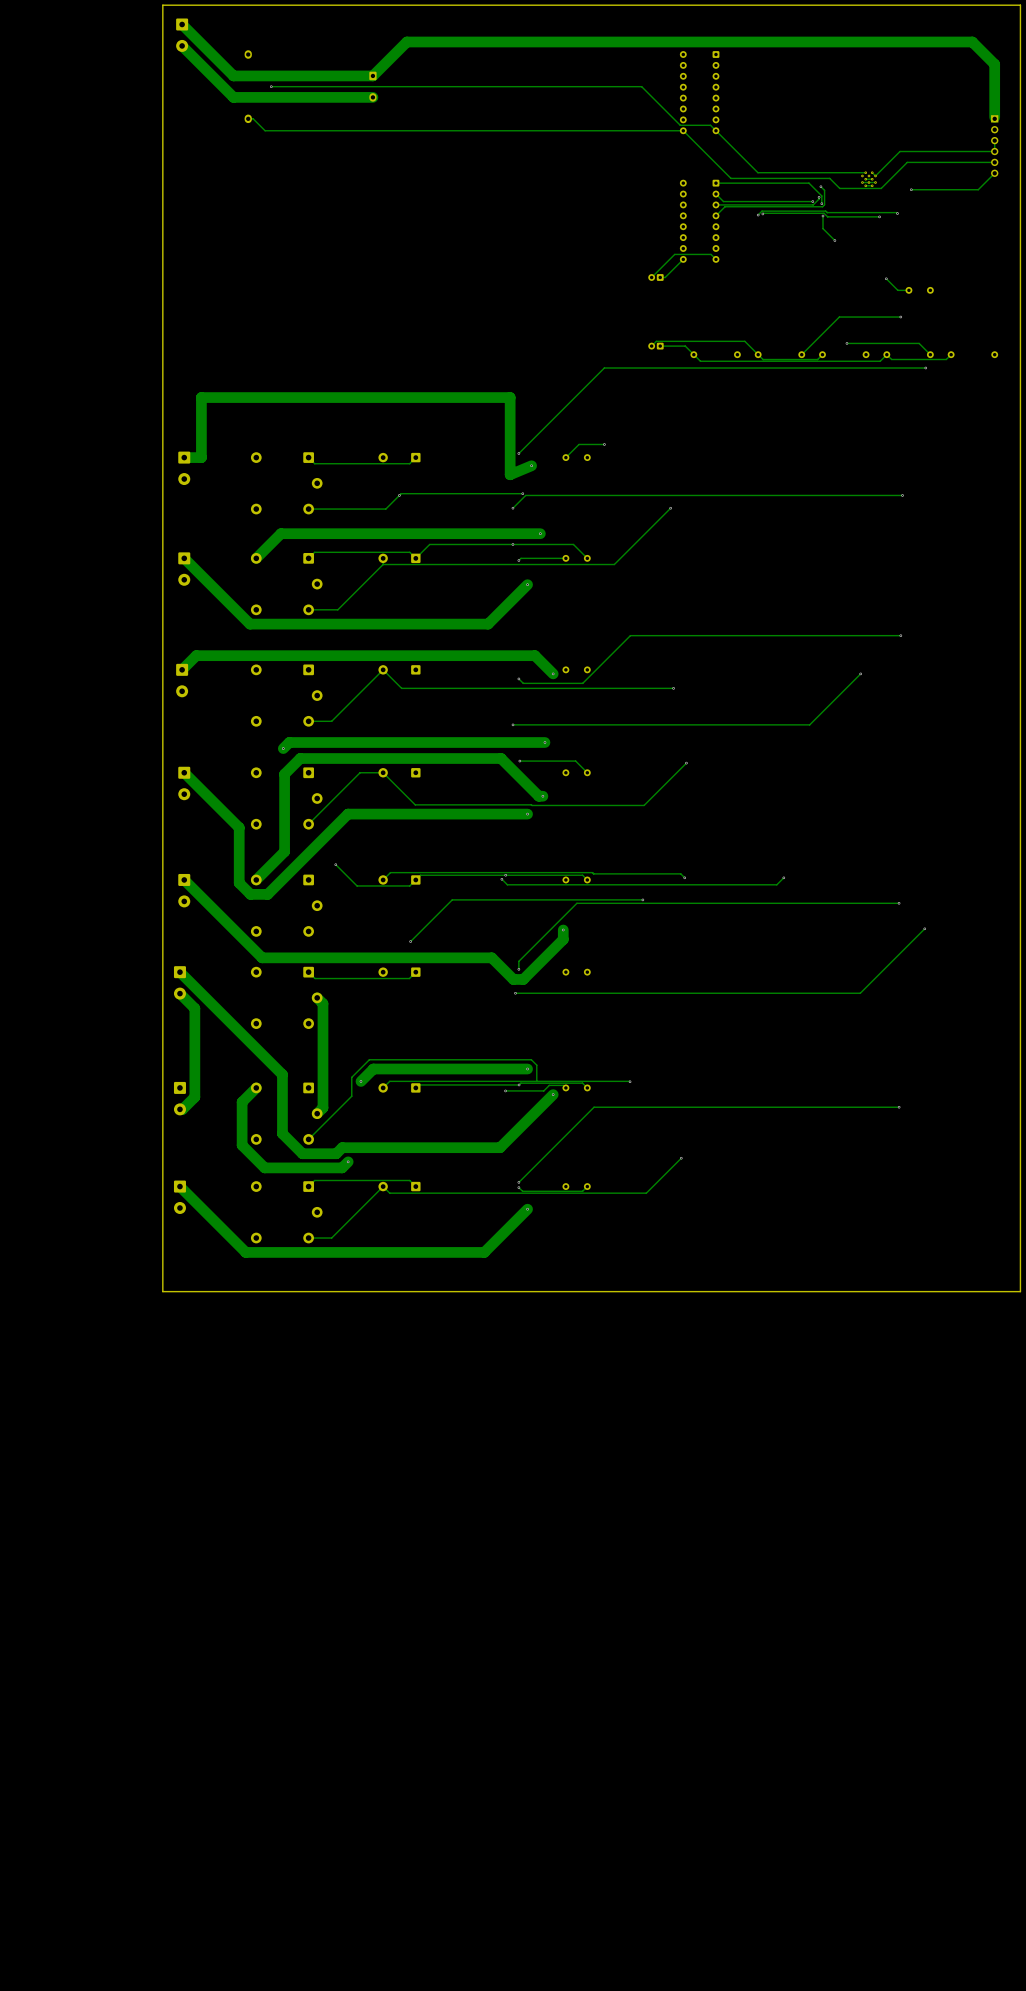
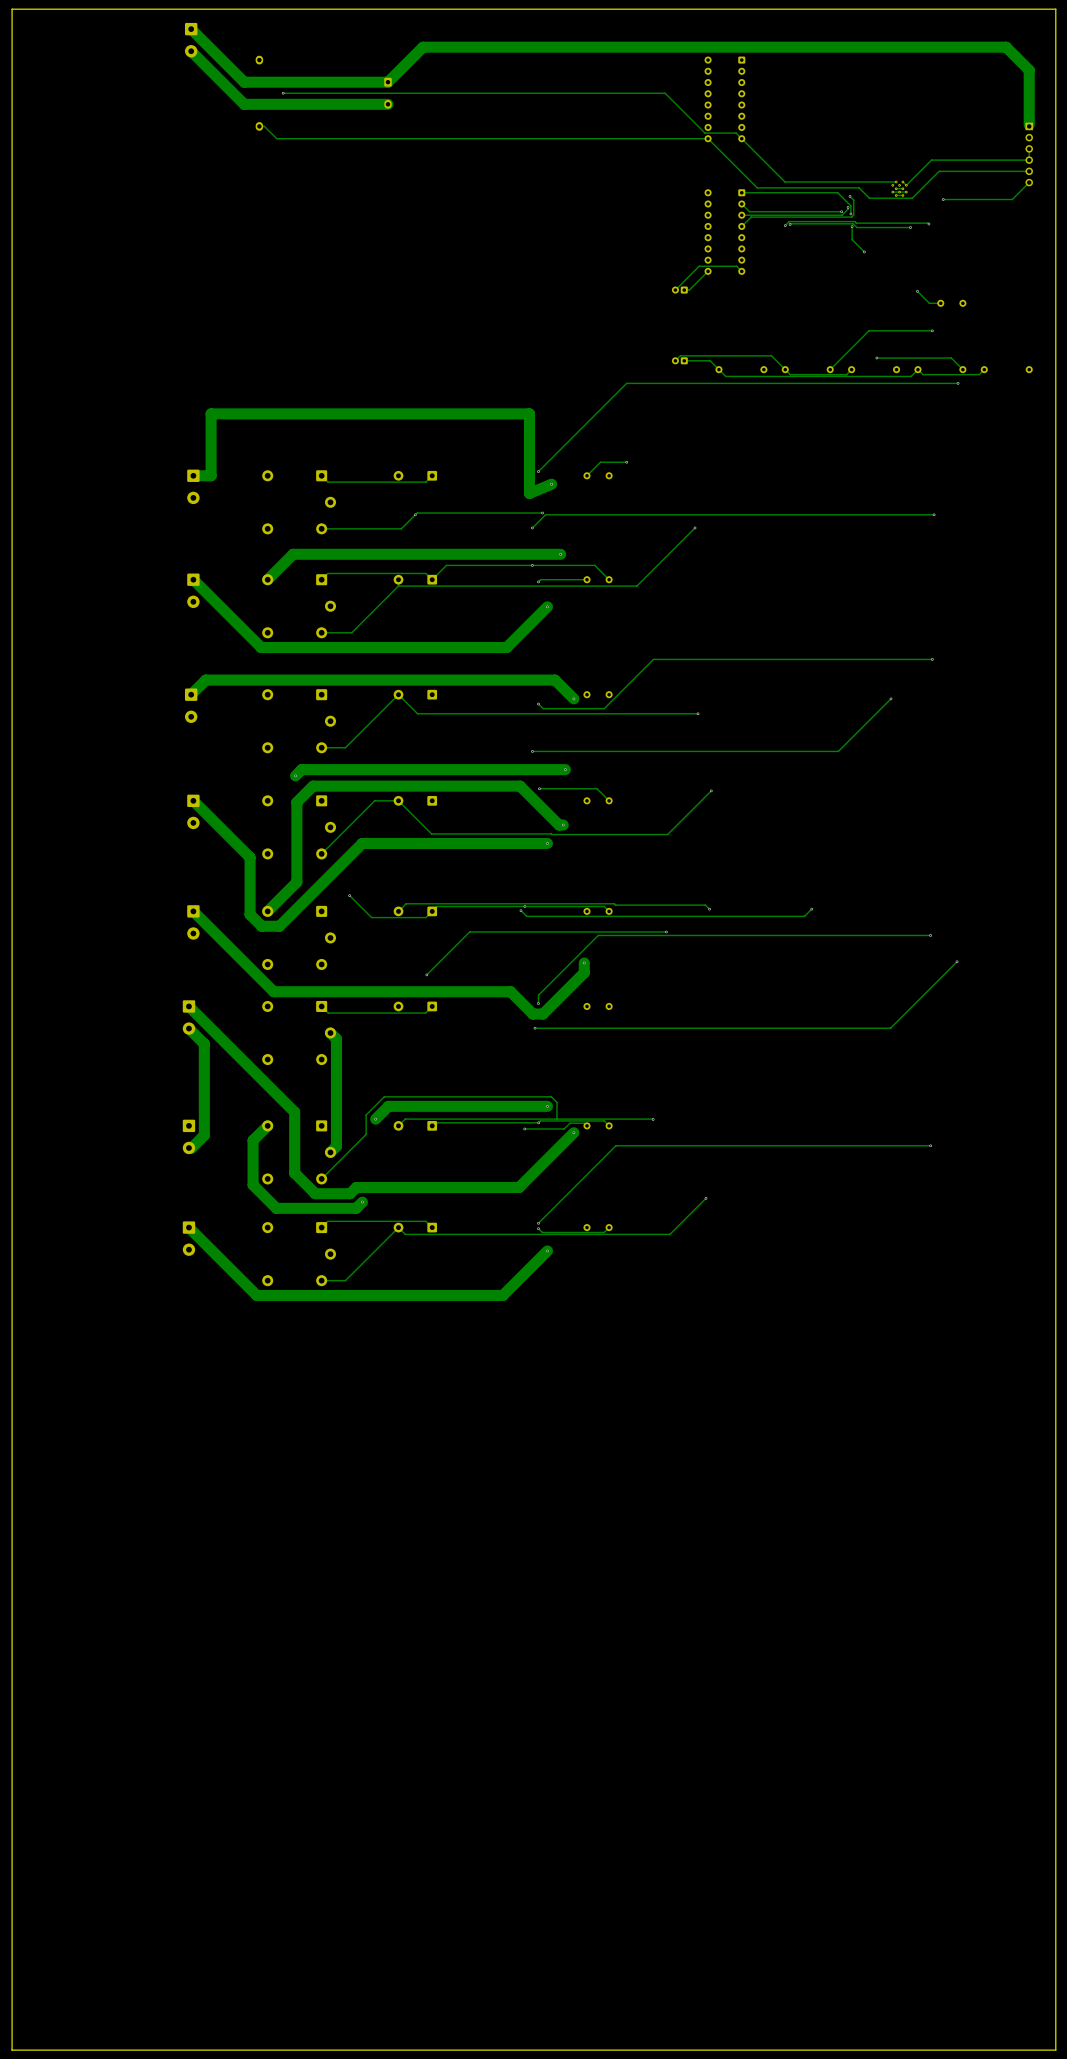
board edge: (162, 5) (162, 1291) (1020, 1291) -> (171, 9) (12, 9) (12, 2050) (1055, 2050) (1055, 1335)

